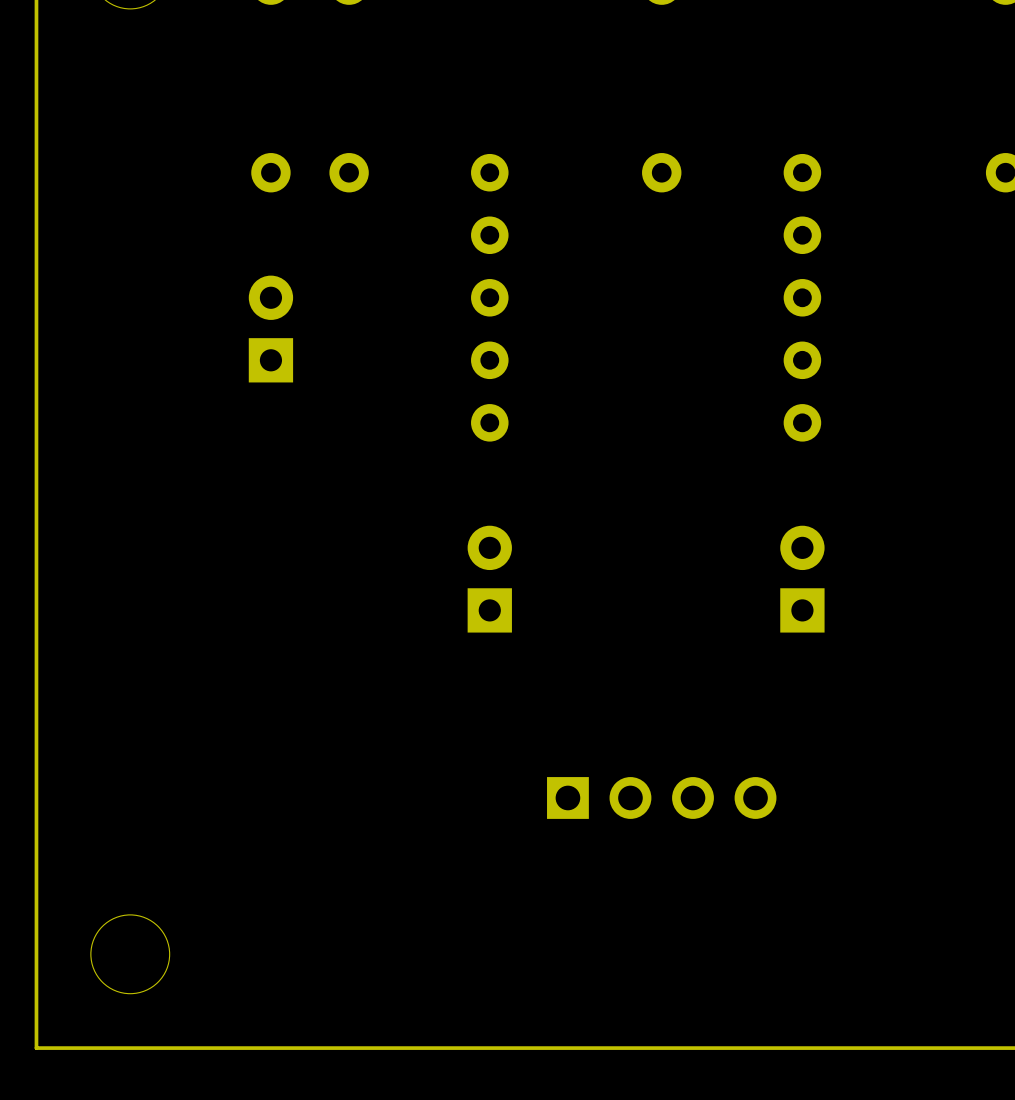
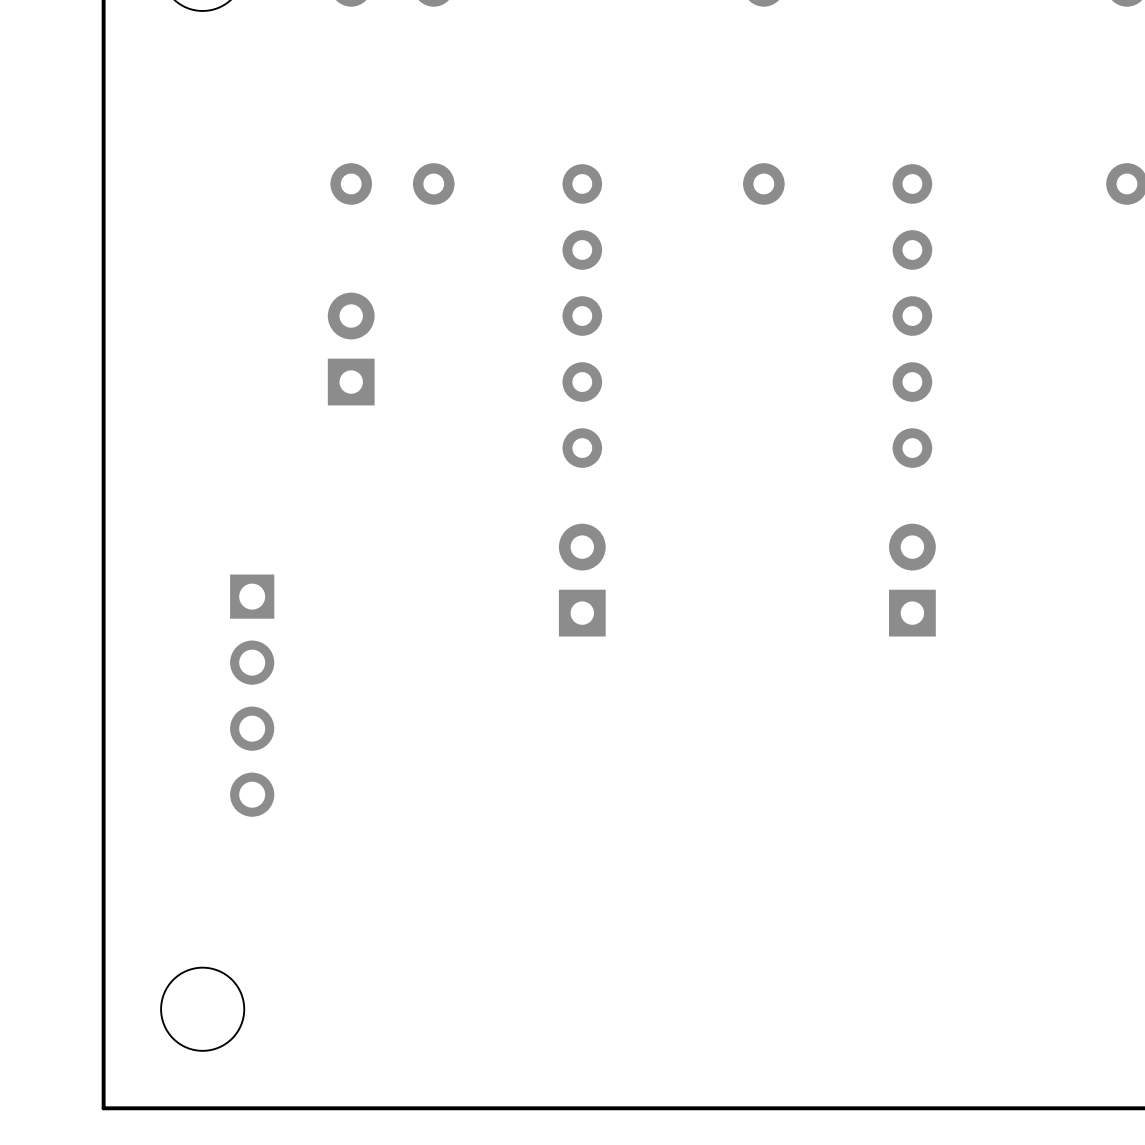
part position: (489, 579) -> (582, 580)
part position: (802, 579) -> (912, 580)
part rotation: 0° (661, 797) -> 90° clockwise (252, 695)
part position: (661, 797) -> (252, 695)

